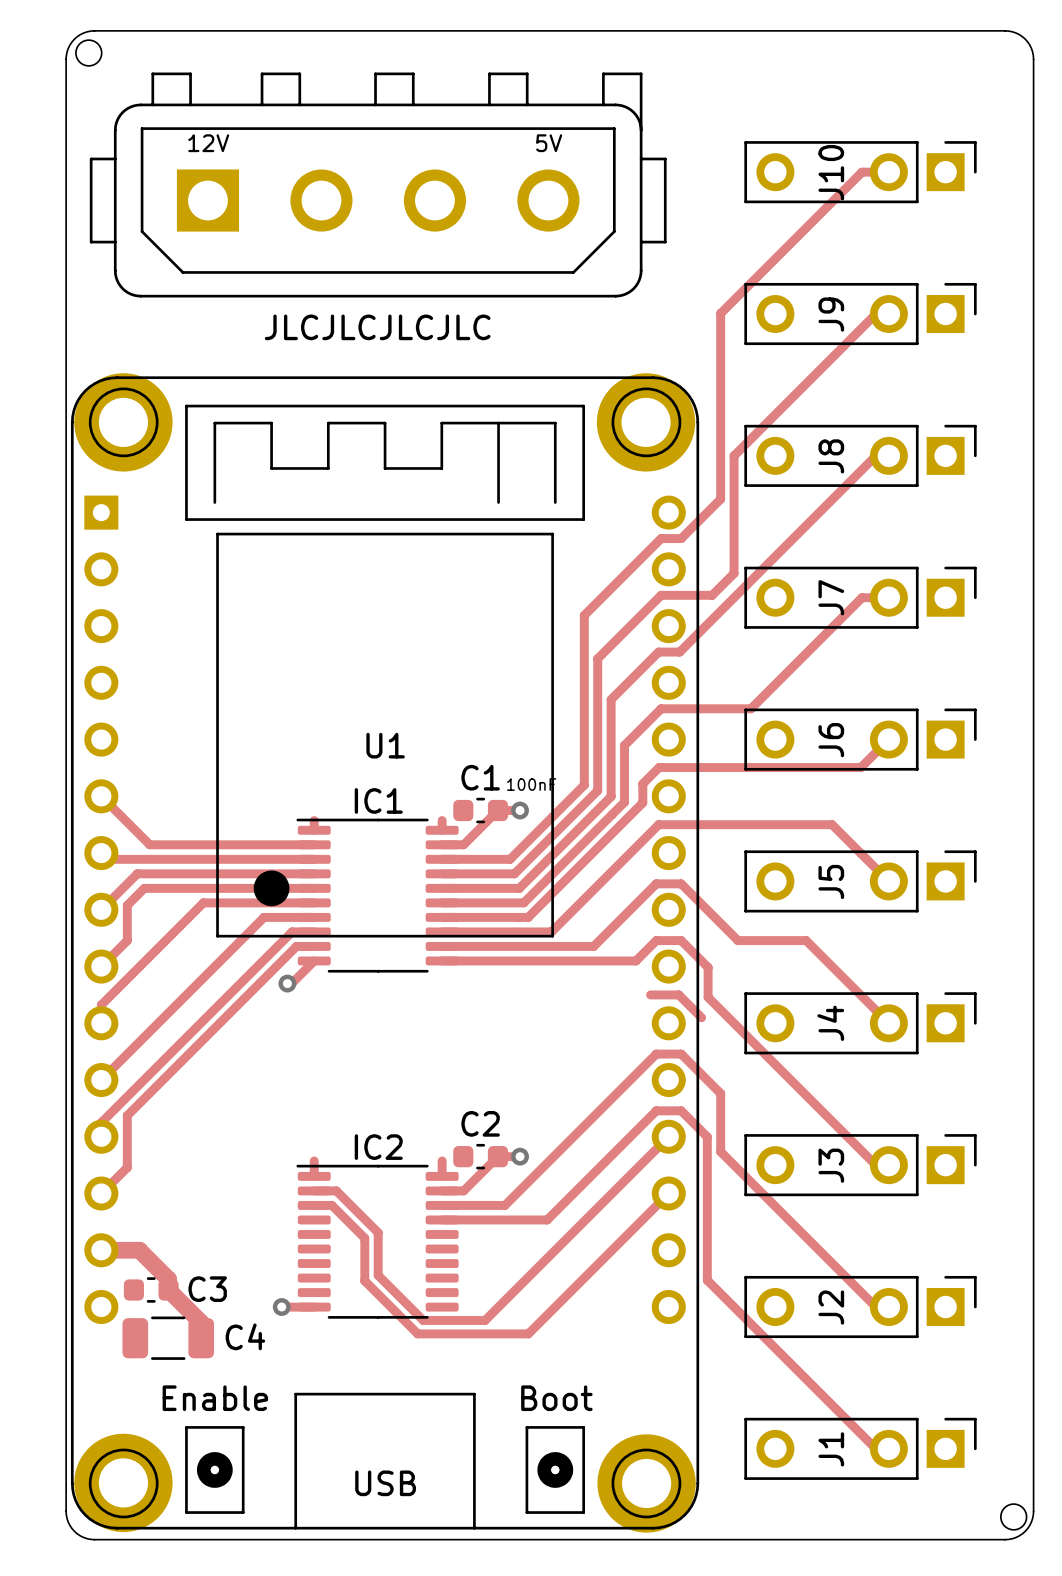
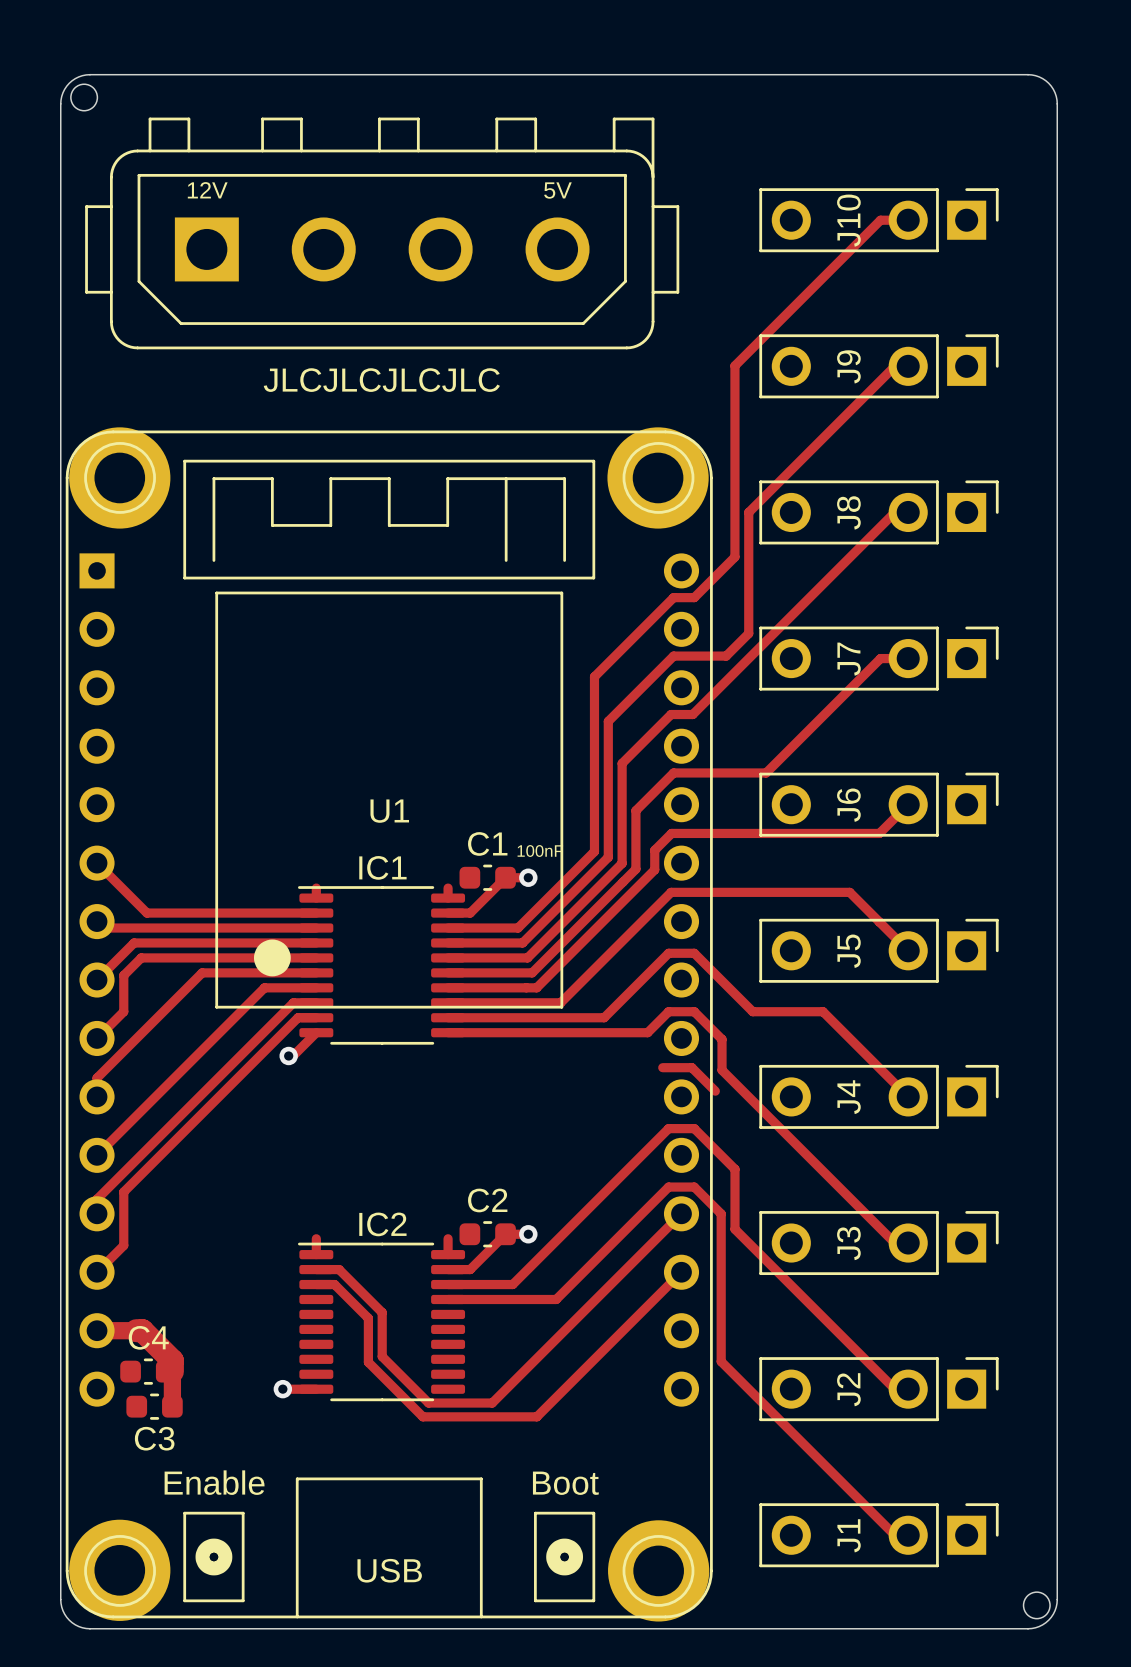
top track: (139, 1250) (168, 1279) (168, 1289) (201, 1322) (201, 1338) -> (136, 1330) (142, 1330) (172, 1360) (172, 1406)
C3 name: C3 (207, 1289) -> C4 (148, 1337)
C3: none -> (154, 1406)
C4: (168, 1338) -> none

